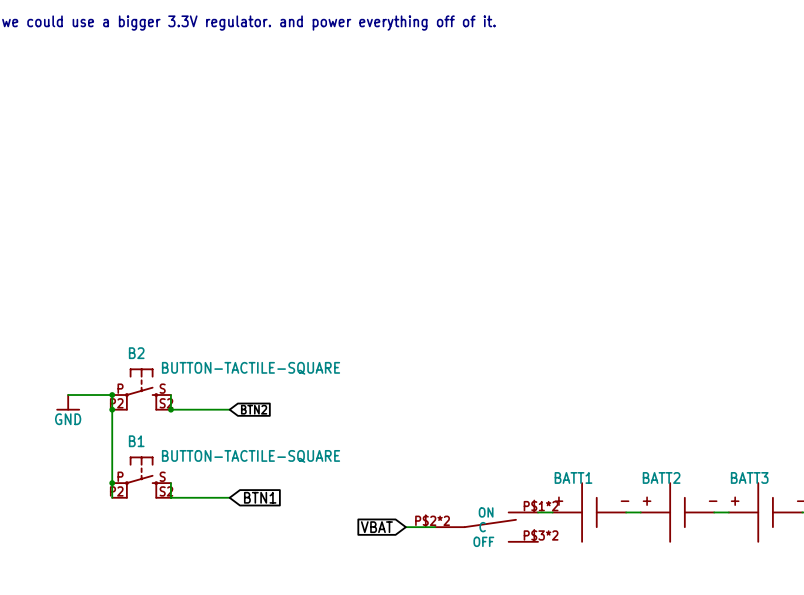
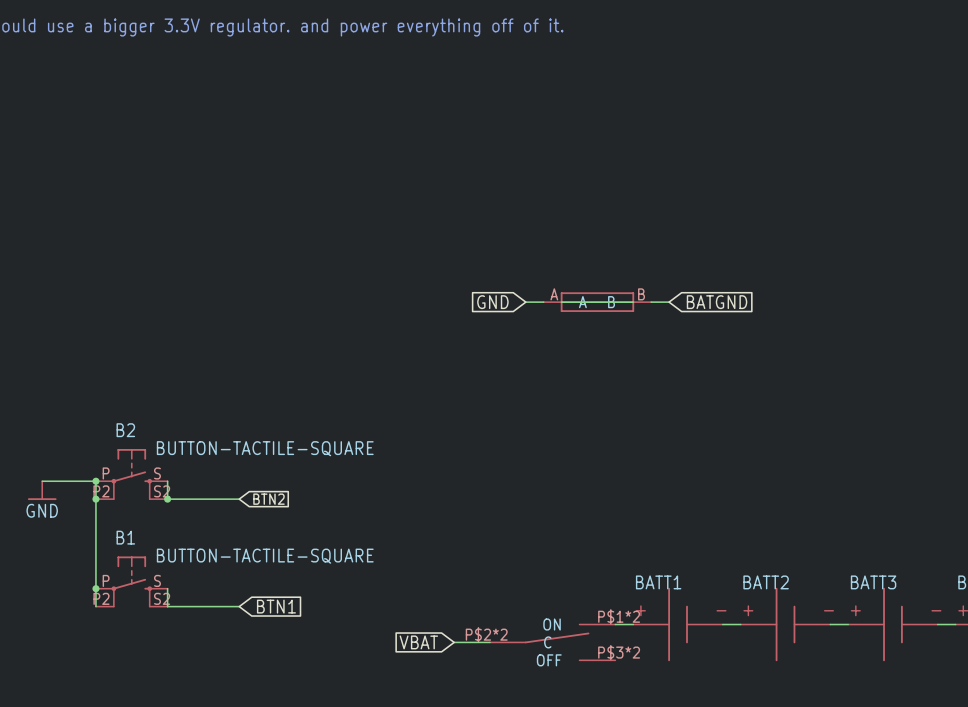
global label: none -> GND (492, 302)
wire: none -> (525, 302) (543, 302)
part: none -> (597, 302)
wire: none -> (651, 302) (669, 302)
global label: none -> BATGND (717, 302)

